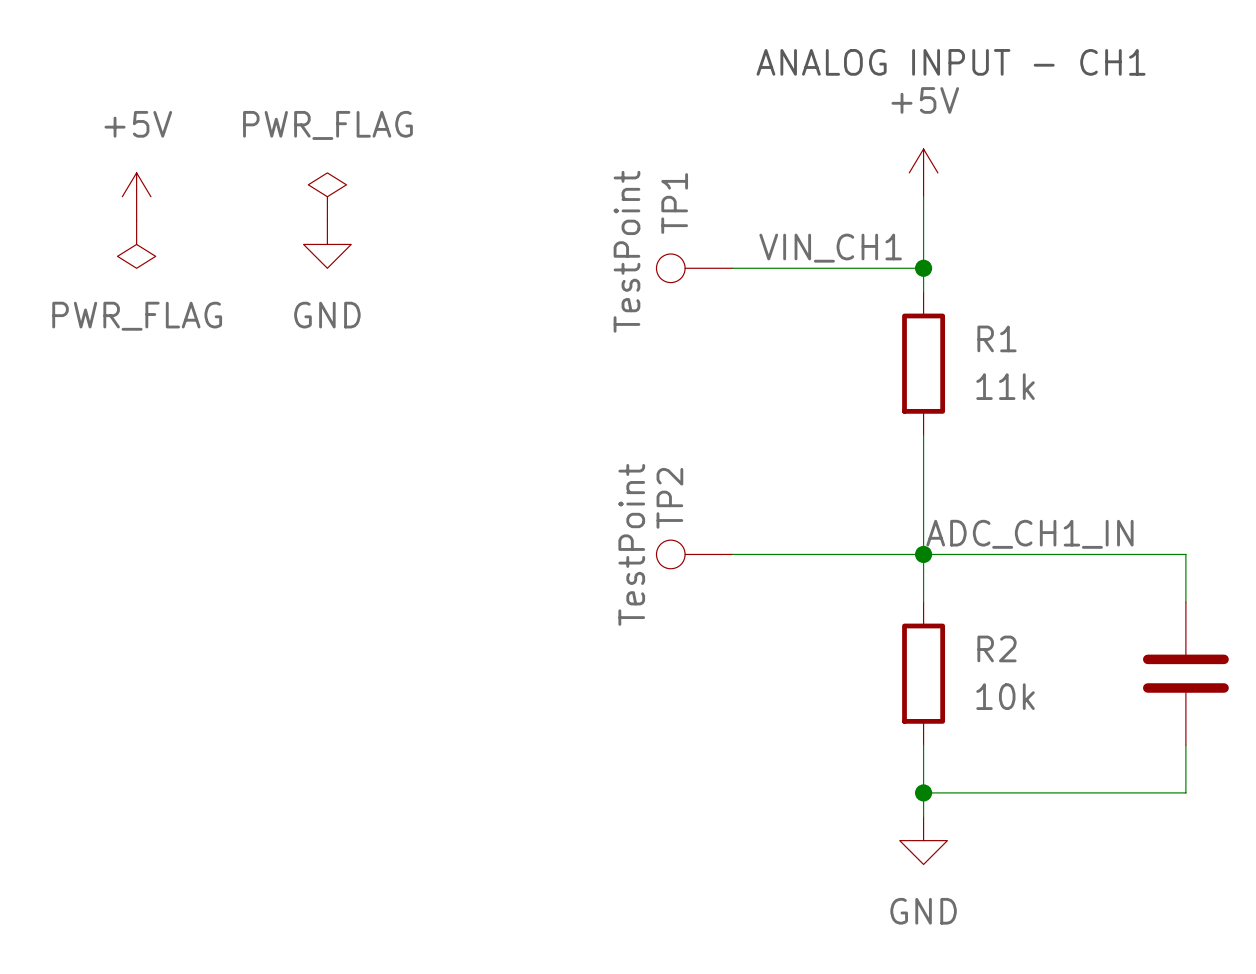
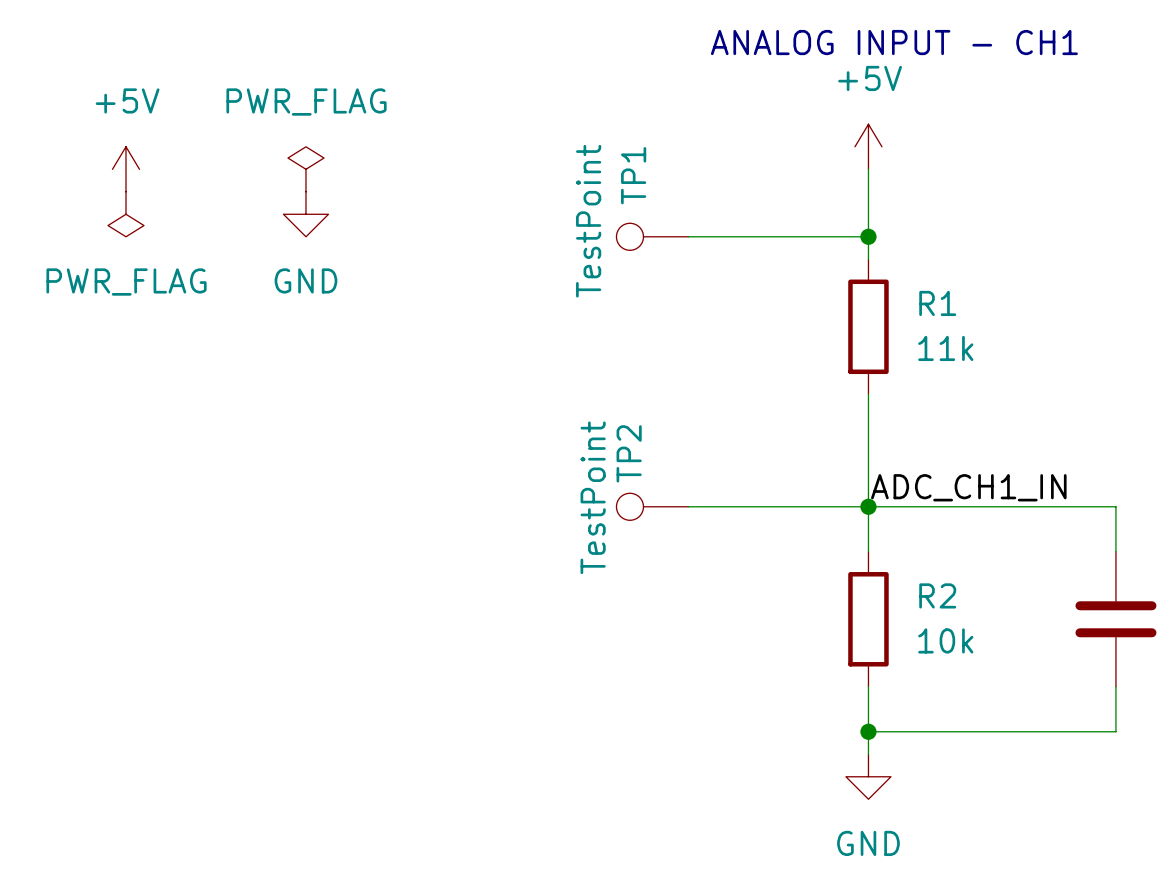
label: VIN_CH1 (830, 248) -> none

